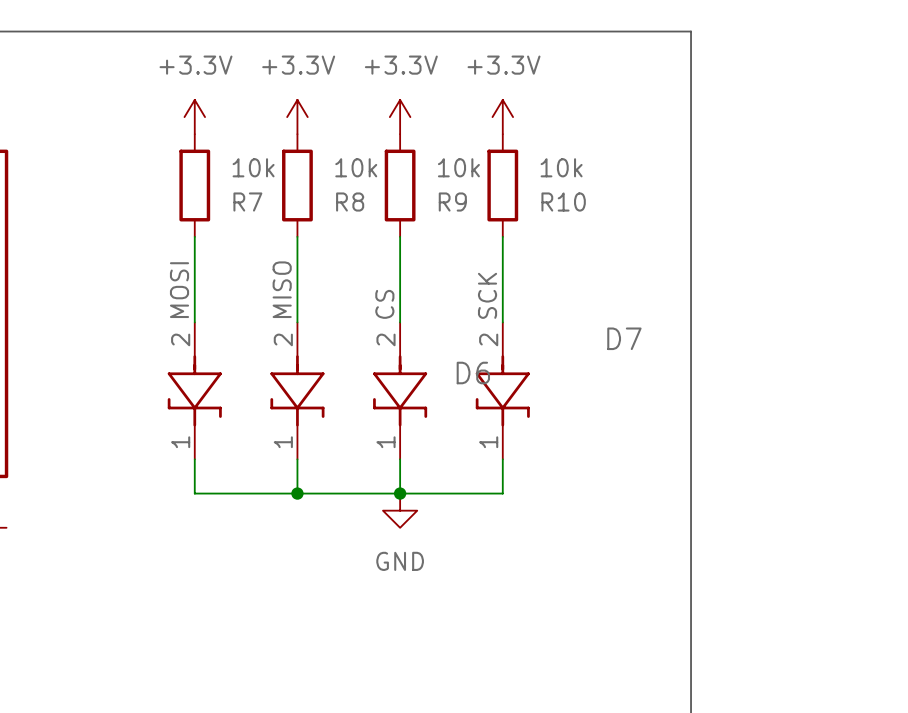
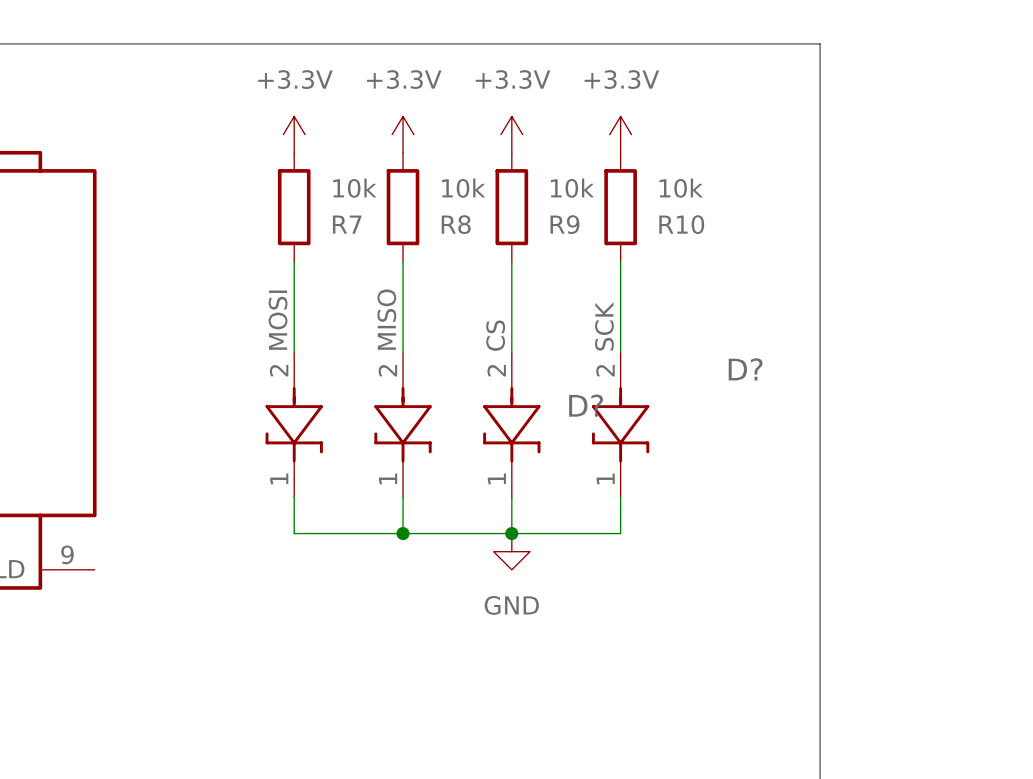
D7 name: D7 (624, 338) -> D? (745, 369)
D6 name: D6 (473, 373) -> D? (586, 405)

